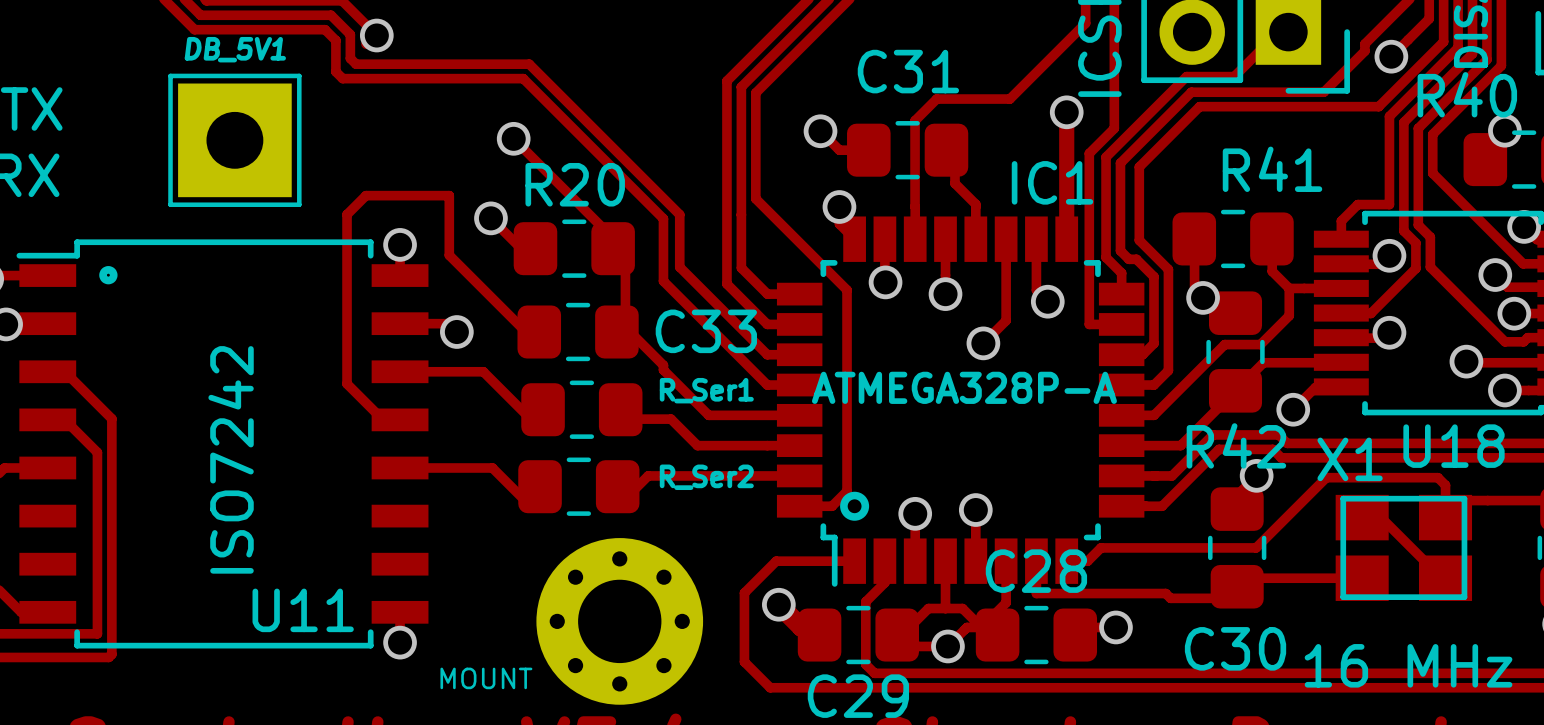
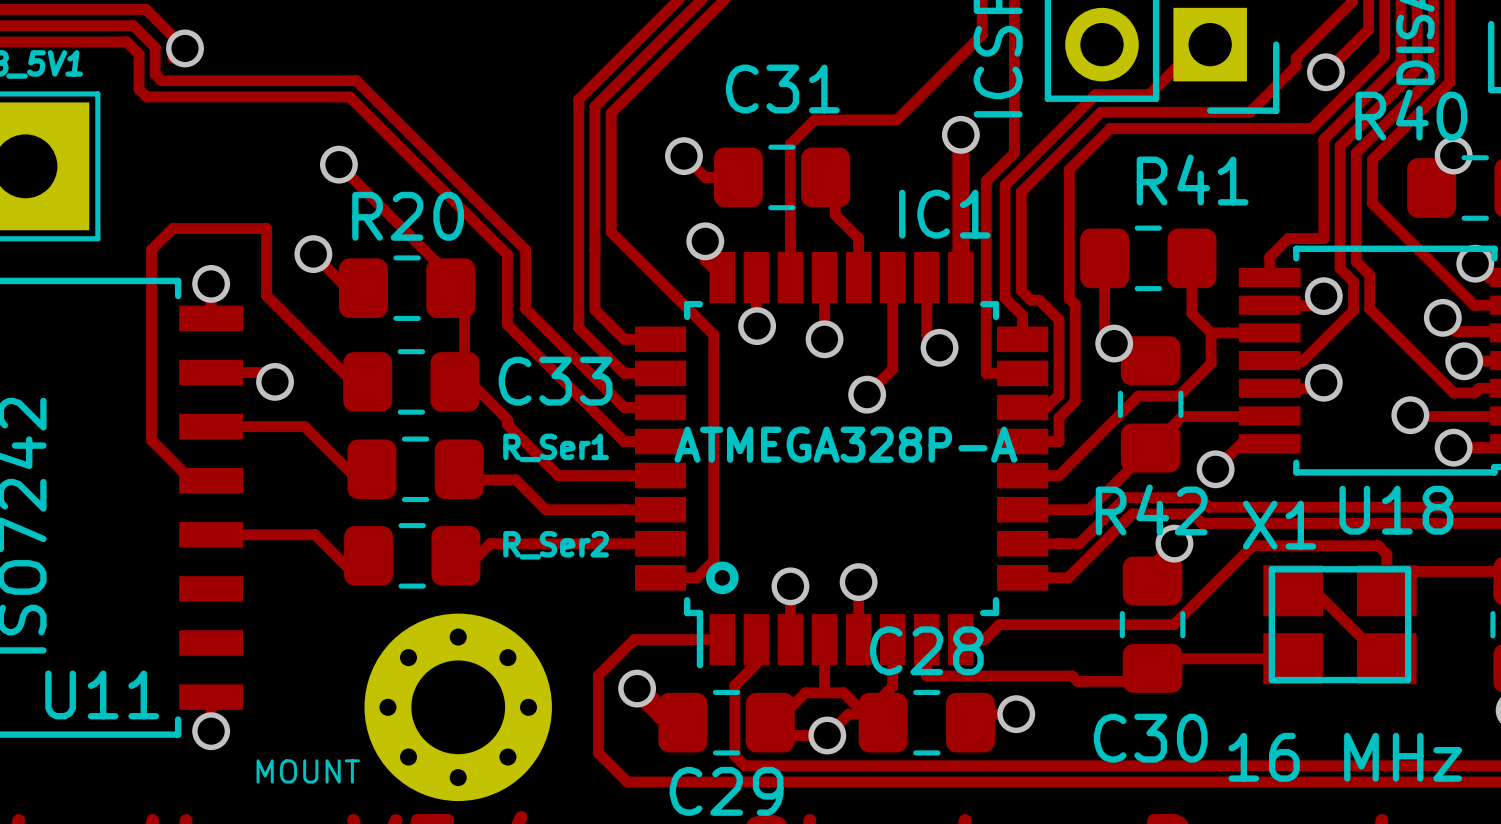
track: (1163, 143) (1139, 167) (1139, 240) (1168, 269) -> (1069, 169) (1069, 298) (1075, 304) (1075, 311)
R41 position: (1233, 238) -> (1148, 258)
track: (1168, 349) (1168, 370) (1154, 385) -> (1075, 401) (1059, 417) (1059, 441)

